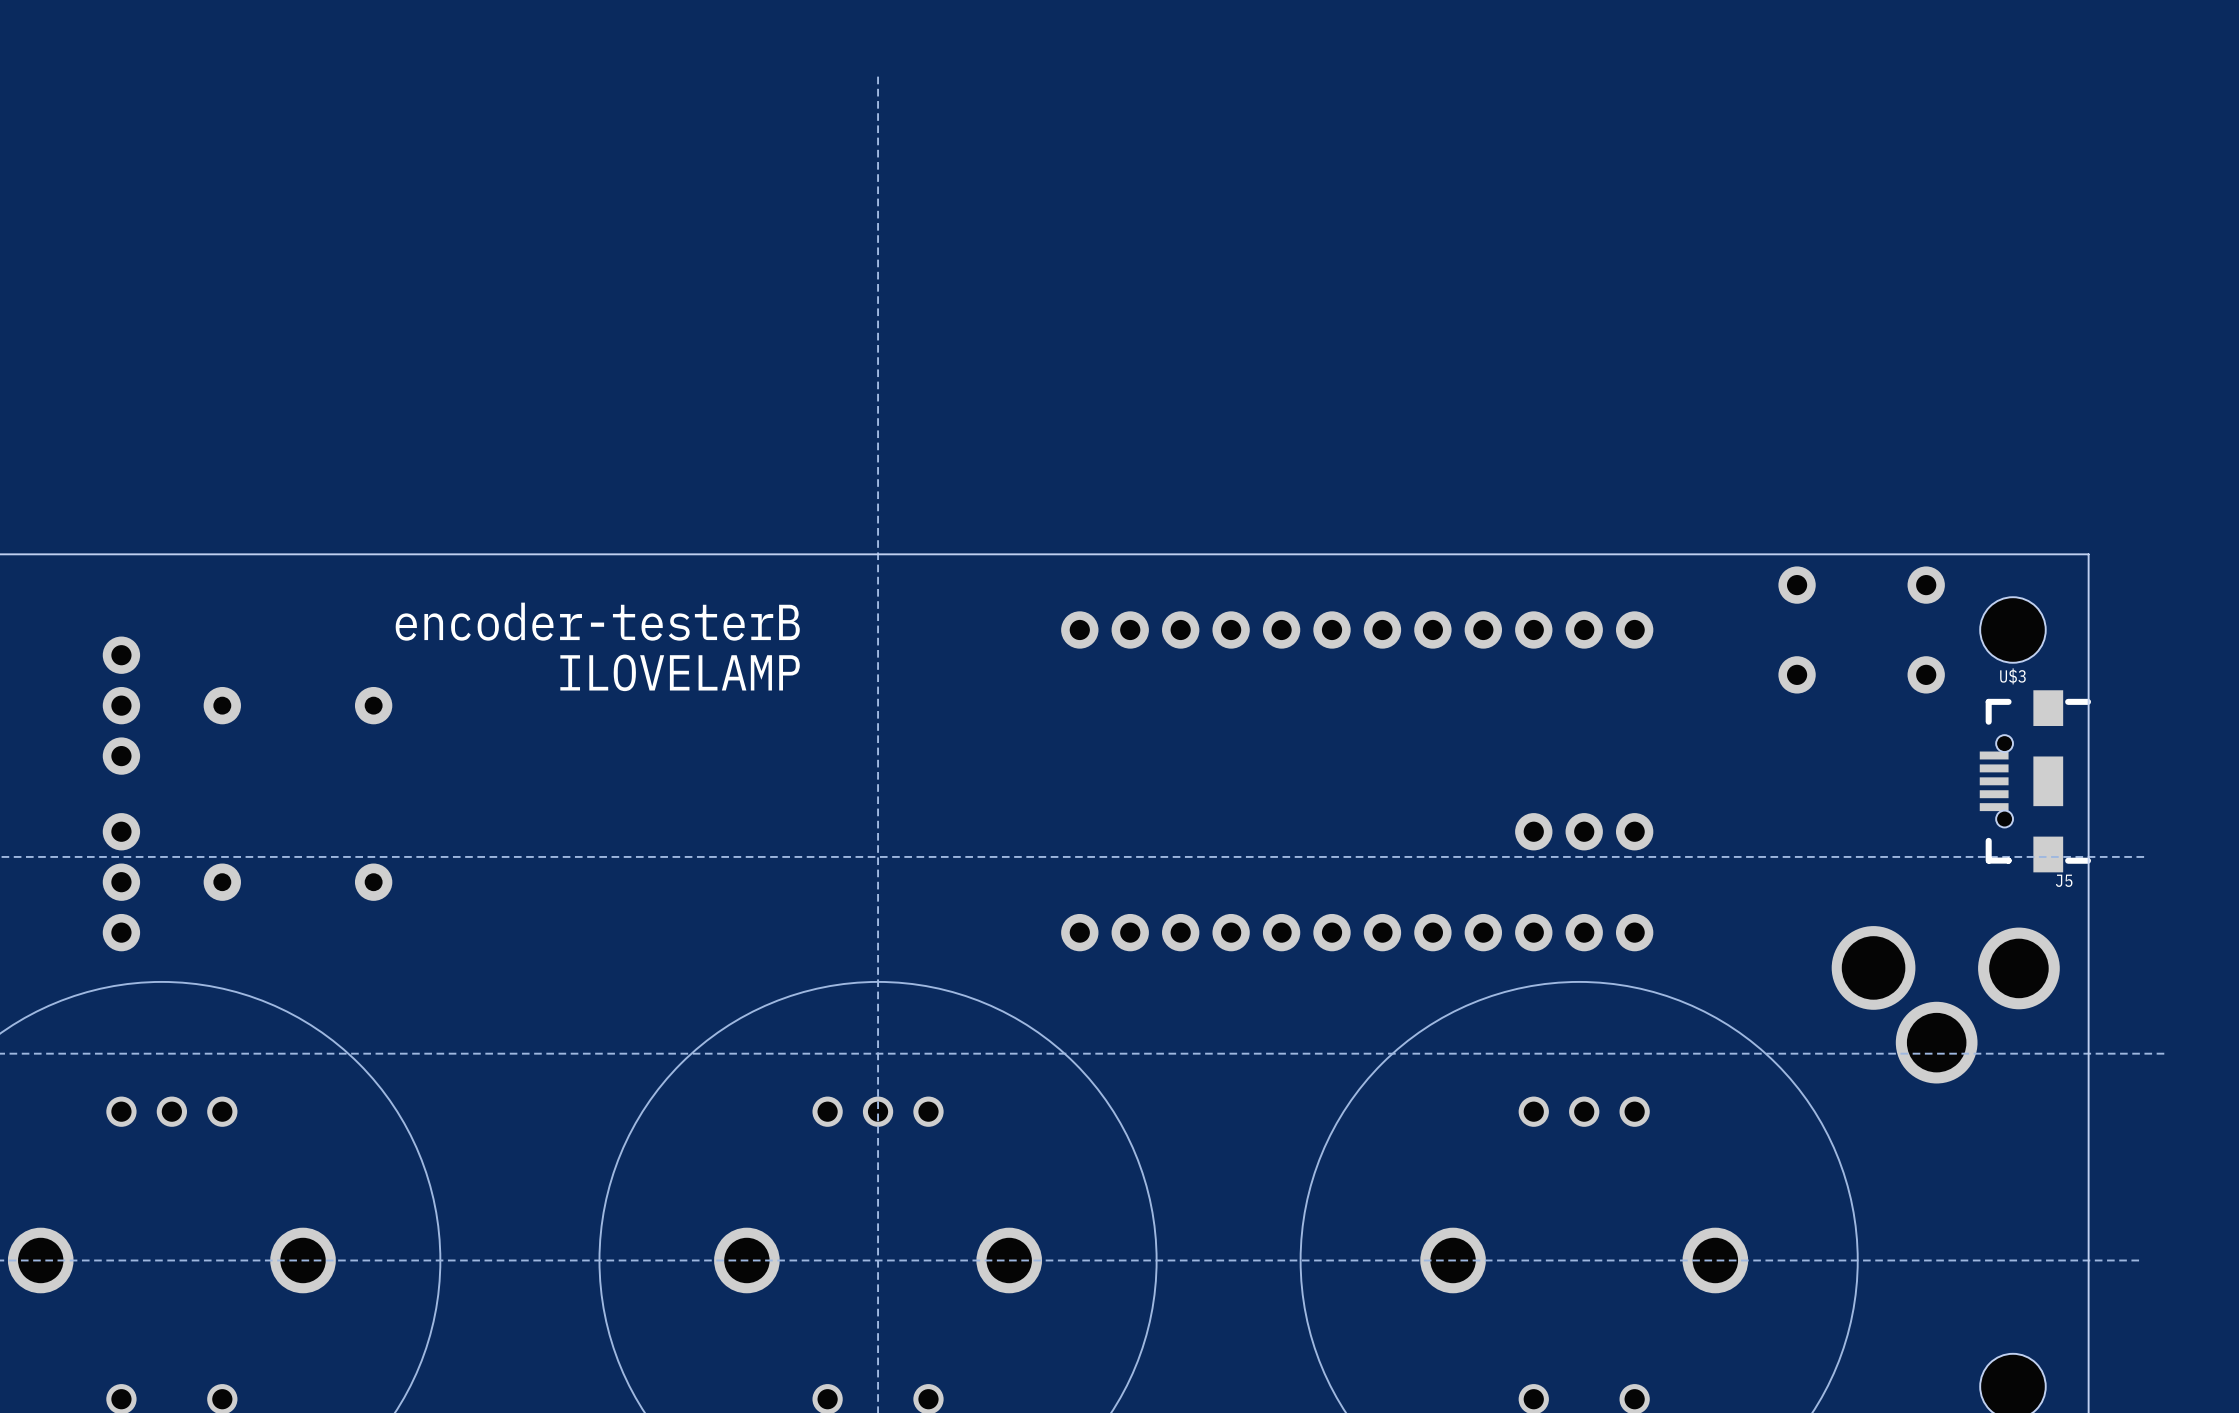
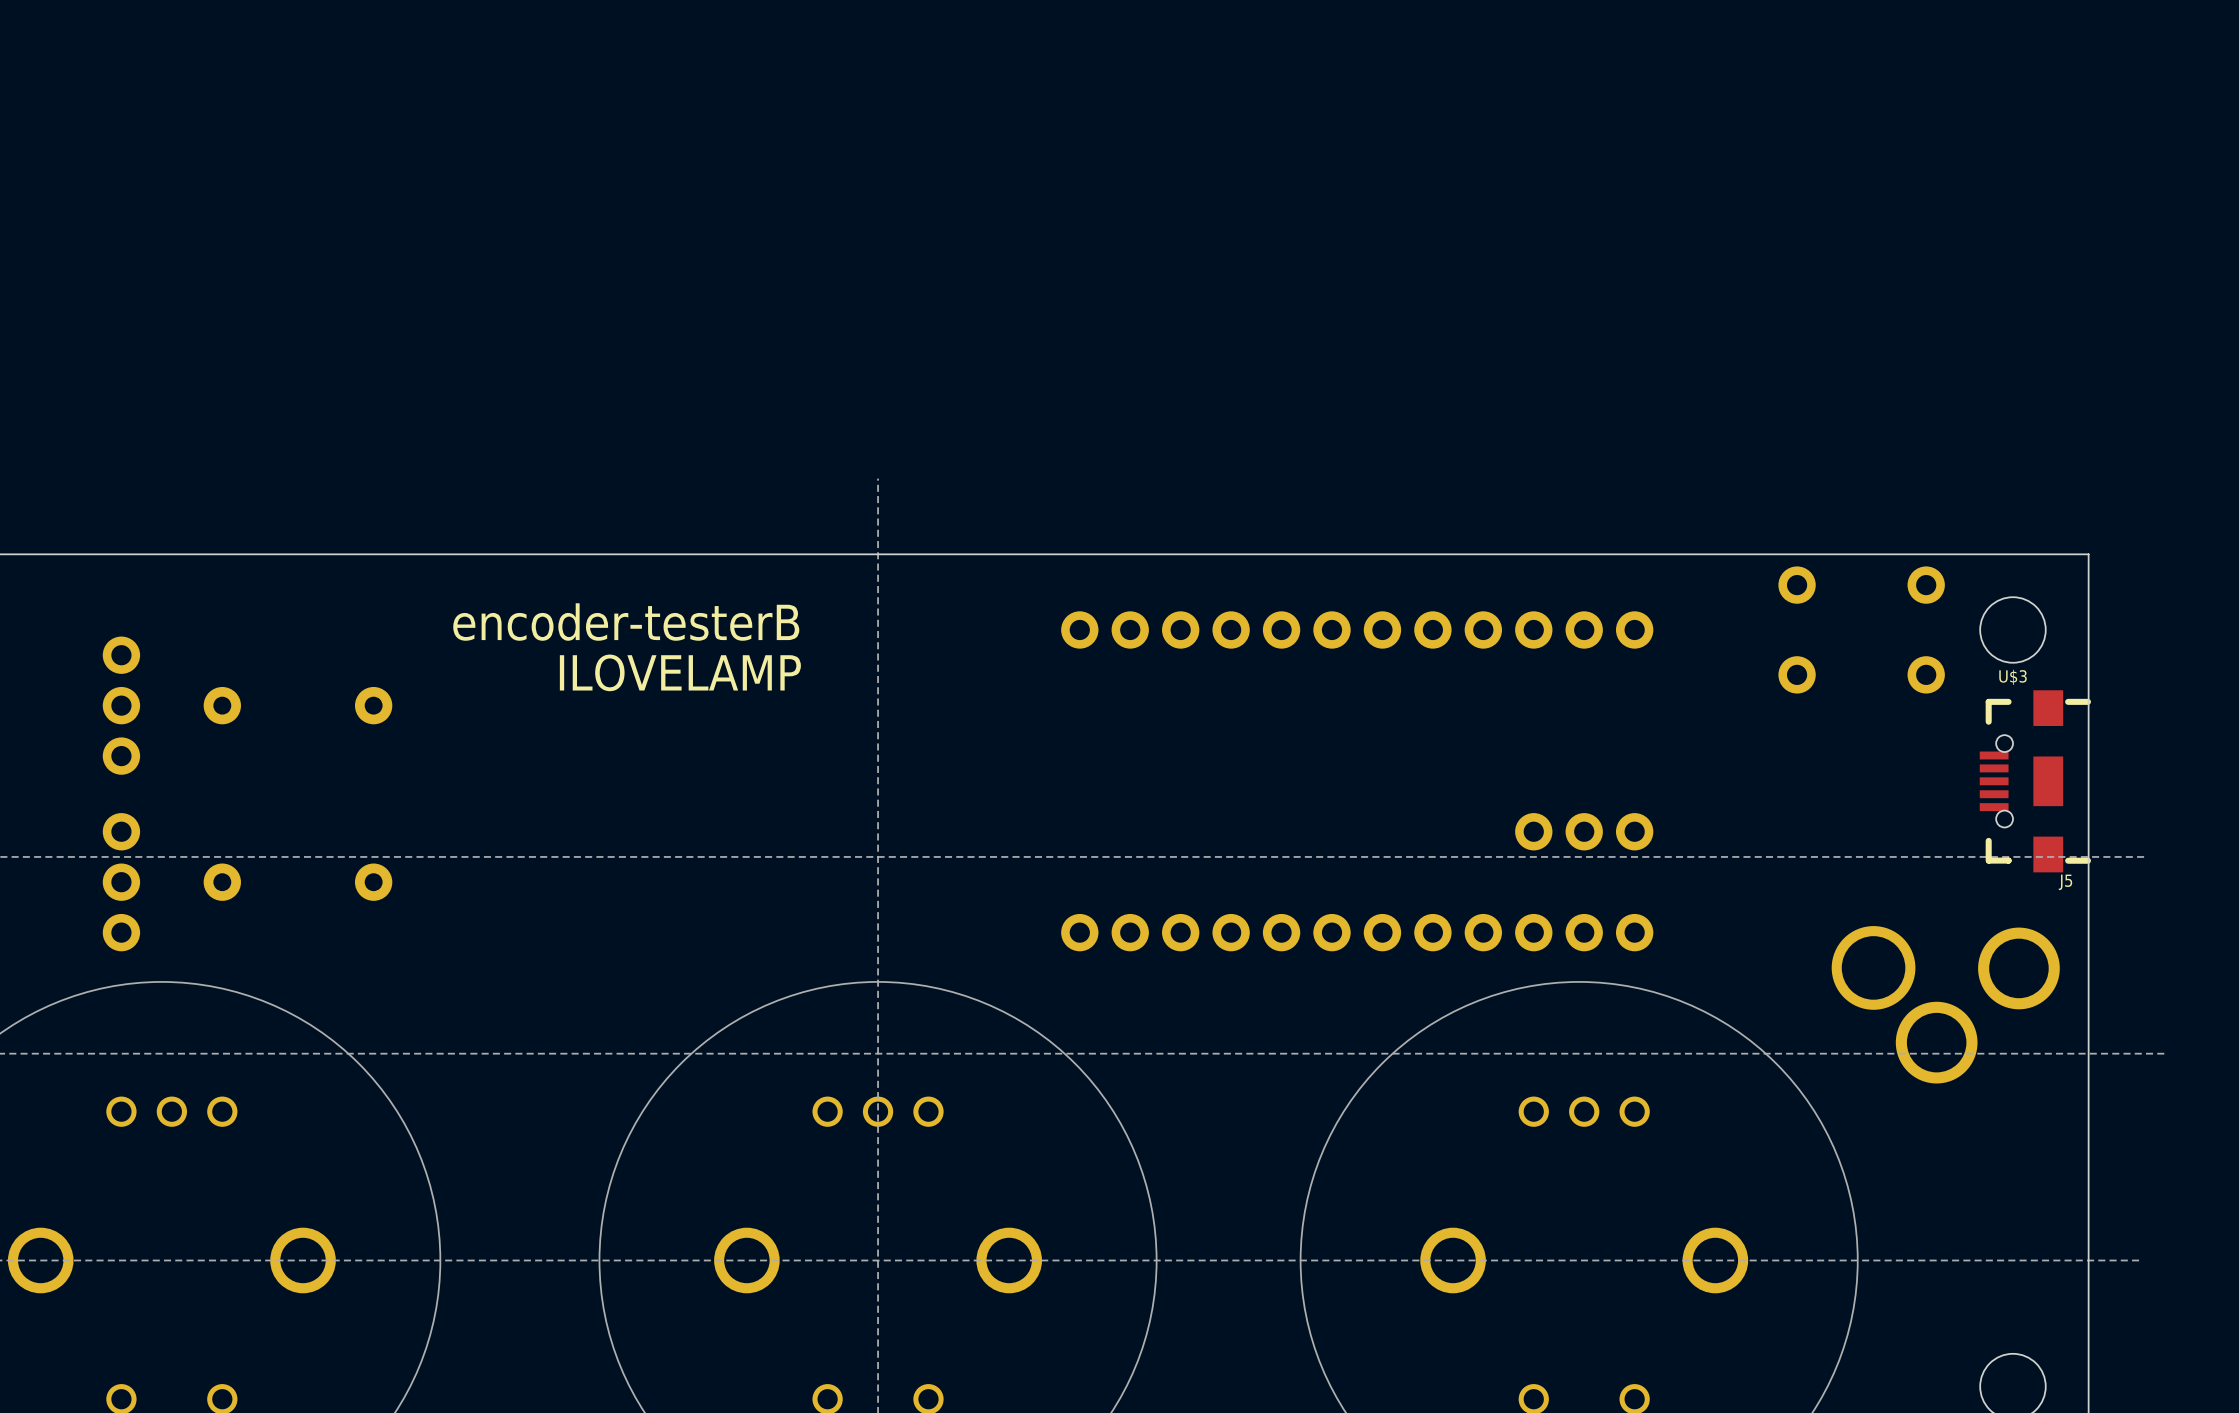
line: (878, 75) (878, 478) -> none

